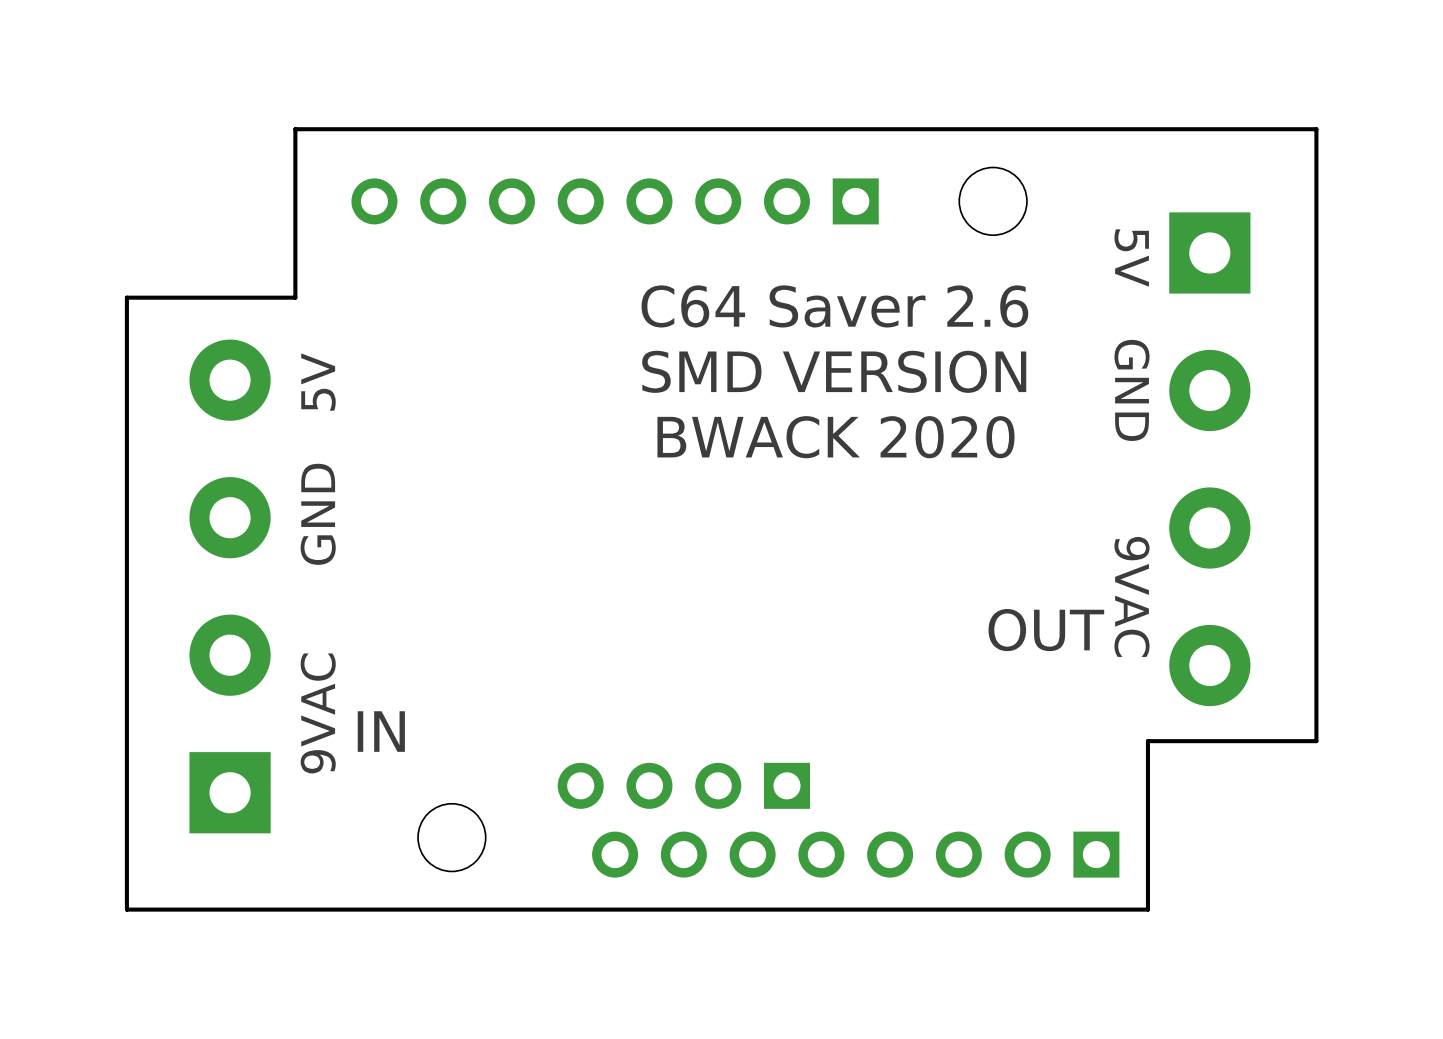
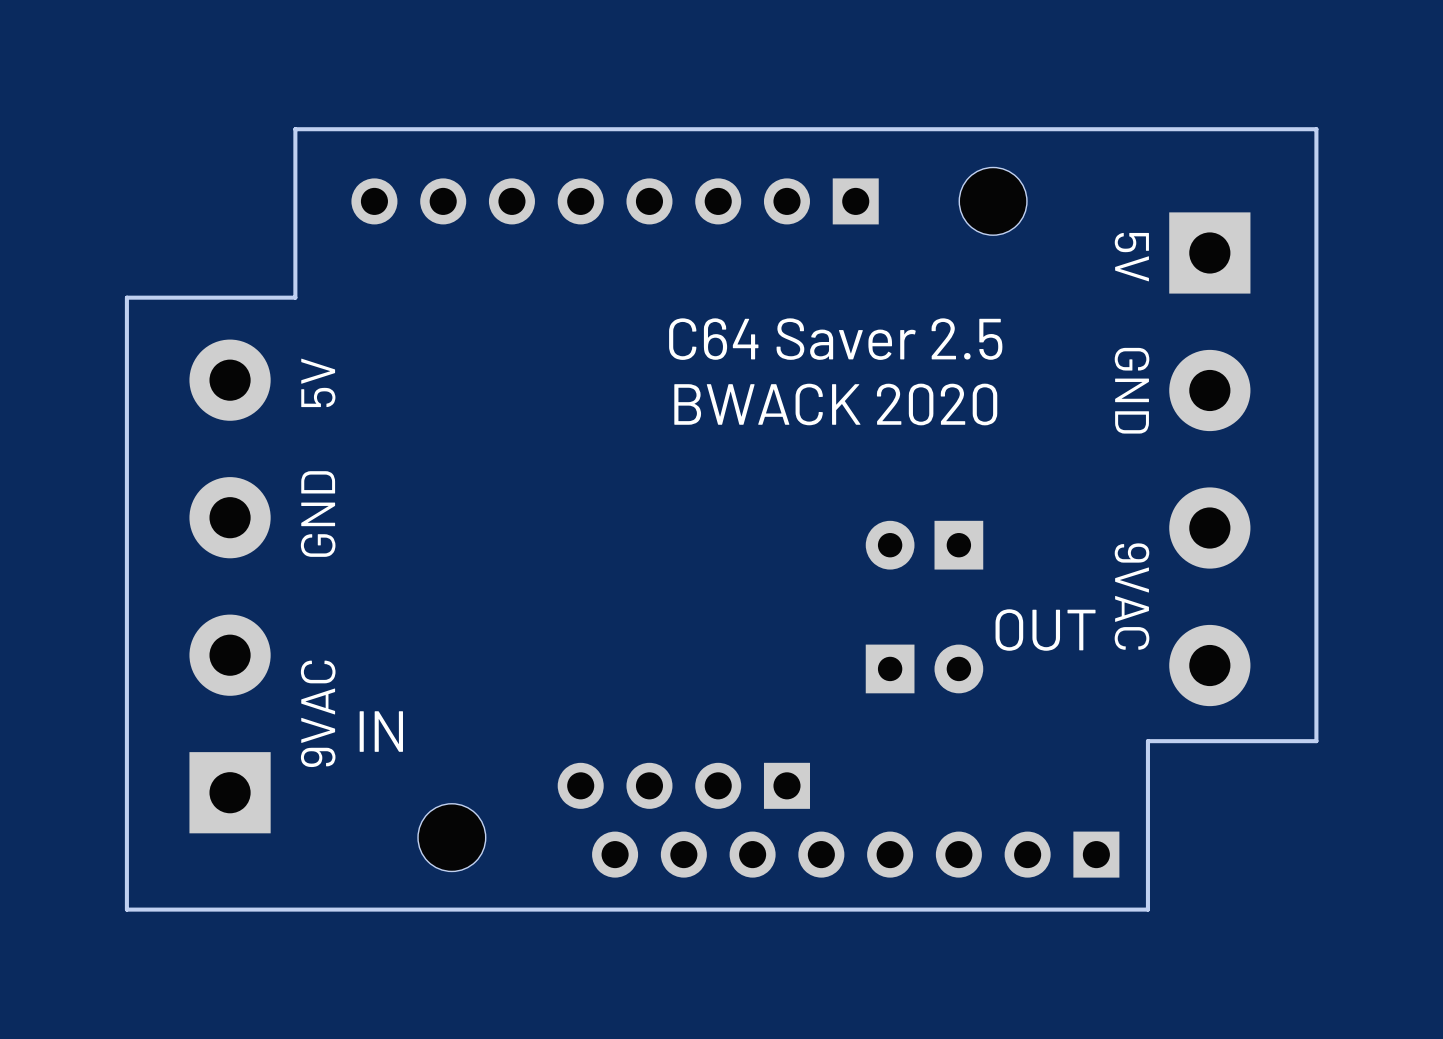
text: C64 Saver 2.6 (834, 306) -> C64 Saver 2.5 (835, 339)
text: SMD VERSION (834, 371) -> none
text position: BWACK 2020 (835, 437) -> BWACK 2020 (835, 404)
part: none -> (924, 545)
part: none -> (924, 668)

